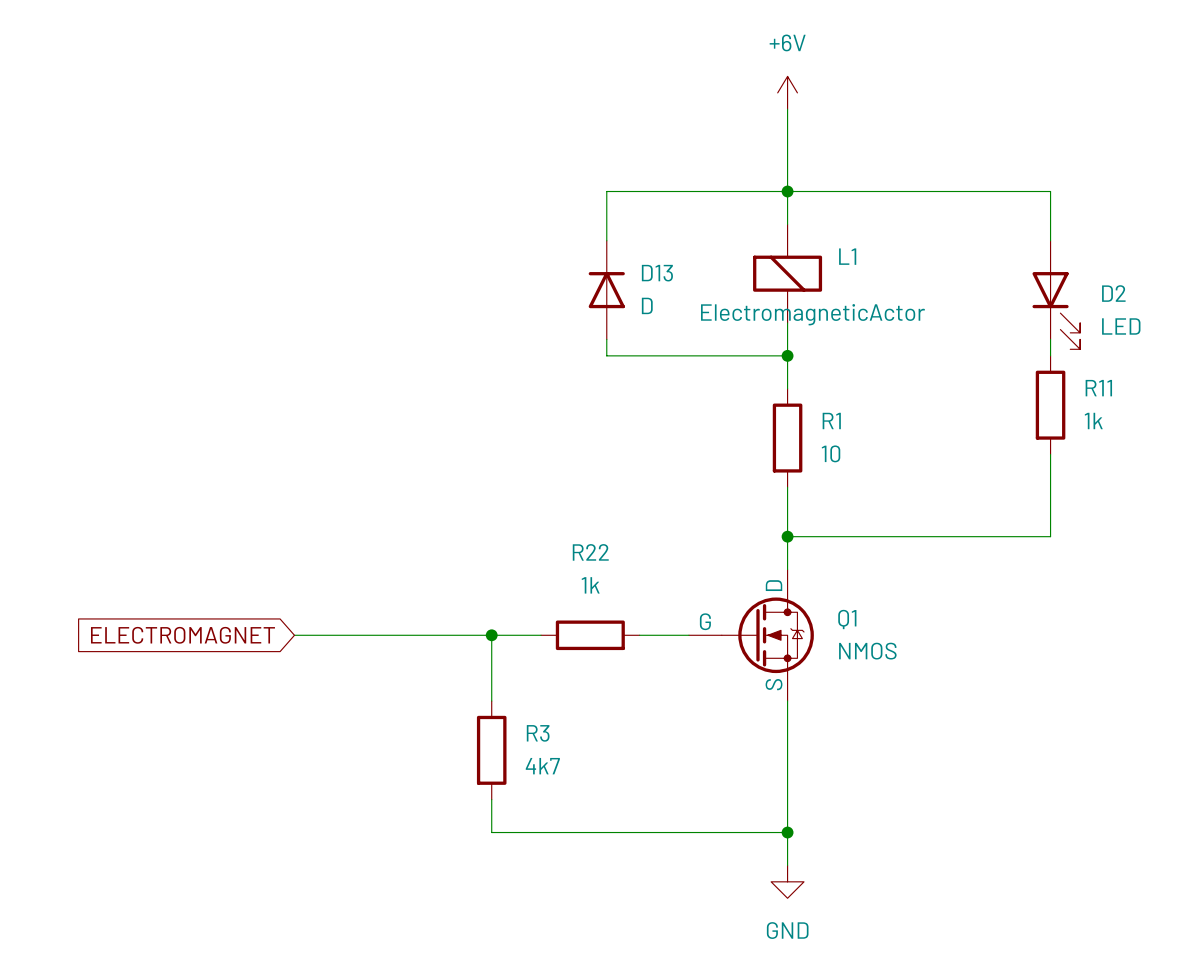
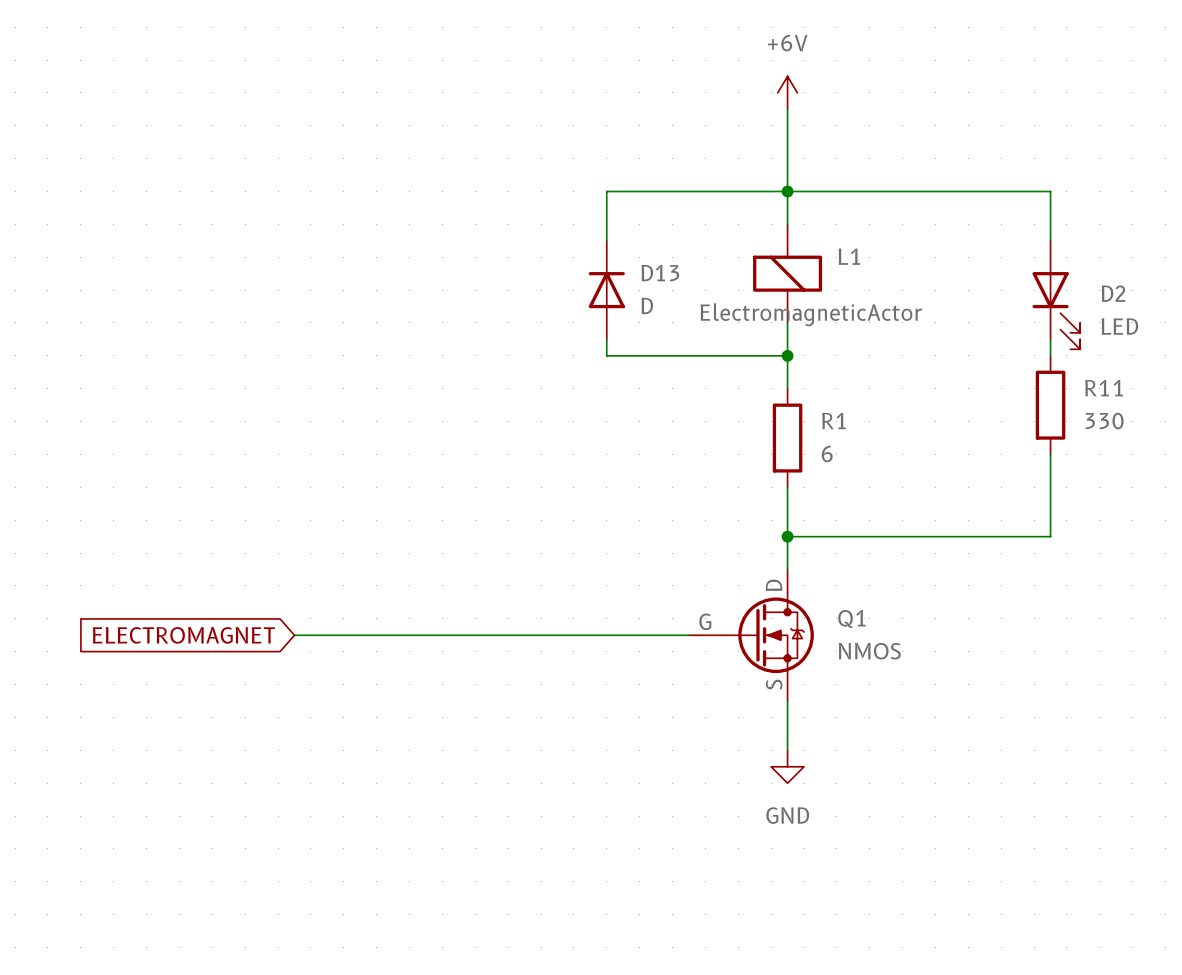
R11 value: 1k (1093, 421) -> 330 (1104, 421)
R1 value: 10 (831, 453) -> 6 (827, 453)
wire: (491, 635) (491, 701) -> none
junction: (491, 635) -> none
wire: none -> (541, 635) (639, 635)
R22: 1k (590, 635) -> none
R3: 4k7 (491, 750) -> none
wire: (787, 750) (787, 865) -> none
wire: (491, 799) (491, 832) (787, 832) -> none
junction: (787, 832) -> none
power symbol position: GND (787, 881) -> GND (787, 766)

